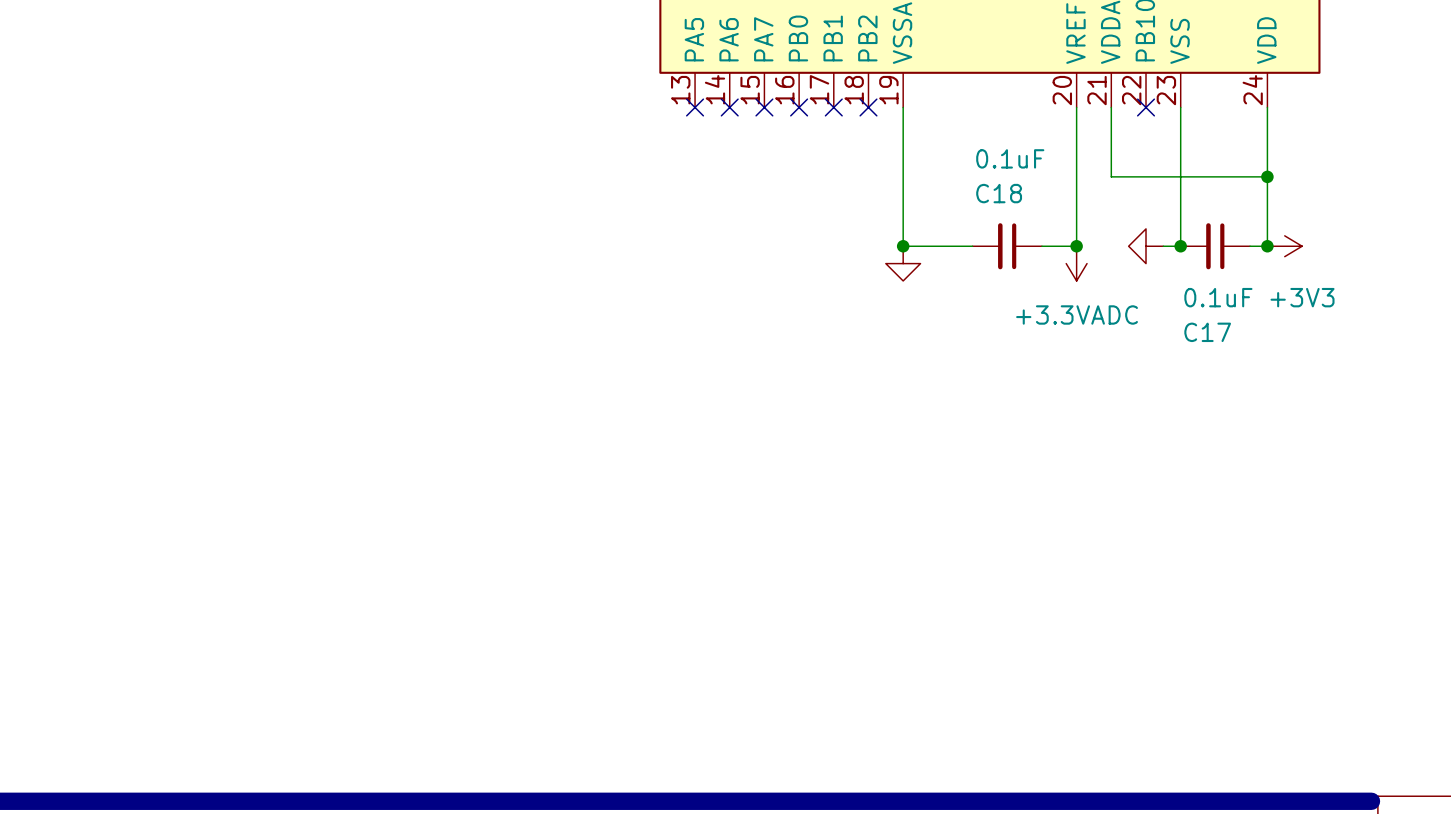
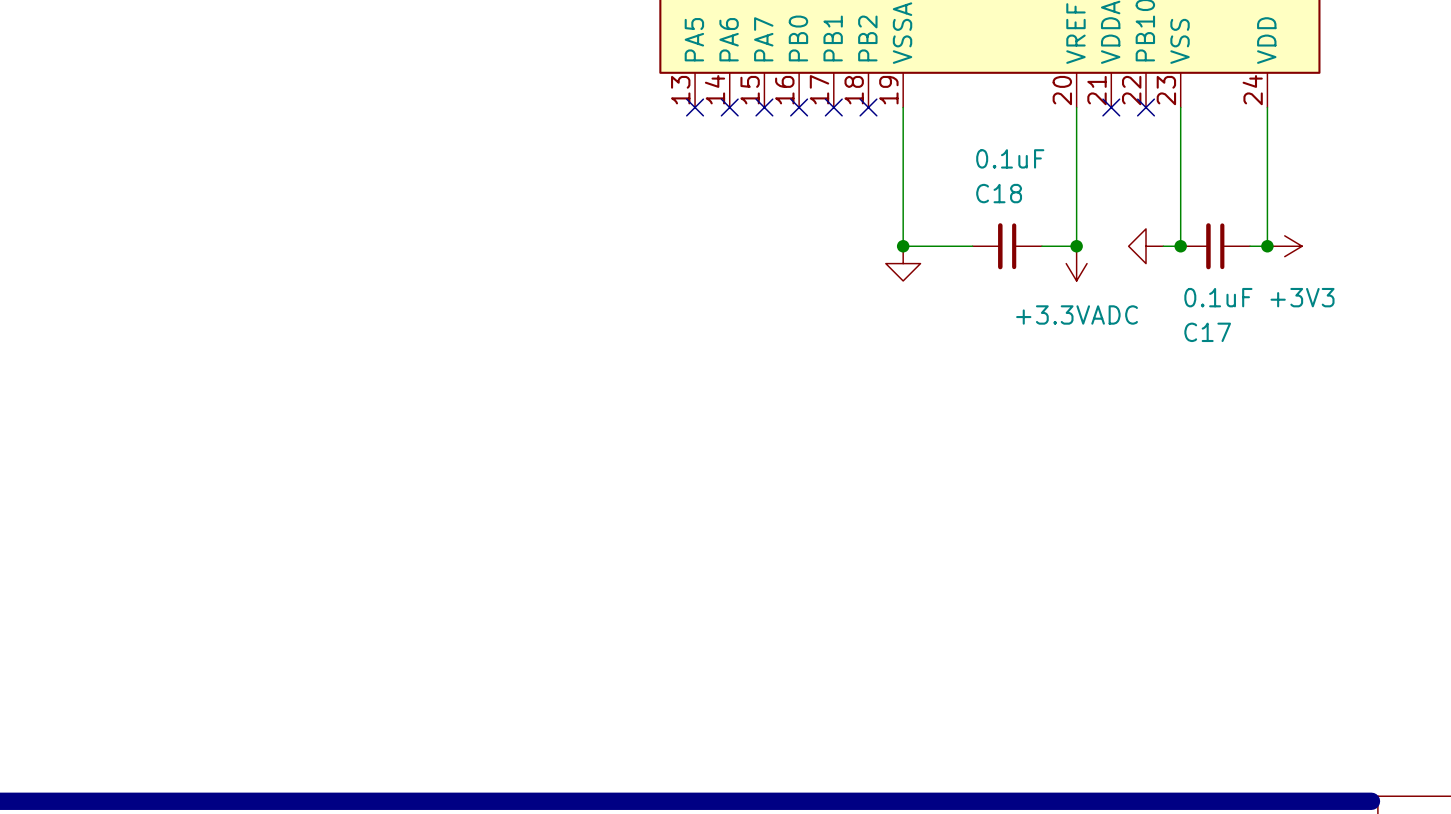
wire: (1111, 107) (1111, 176) (1267, 176) -> none
no-connect mark: none -> (1111, 107)
junction: (1267, 176) -> none

